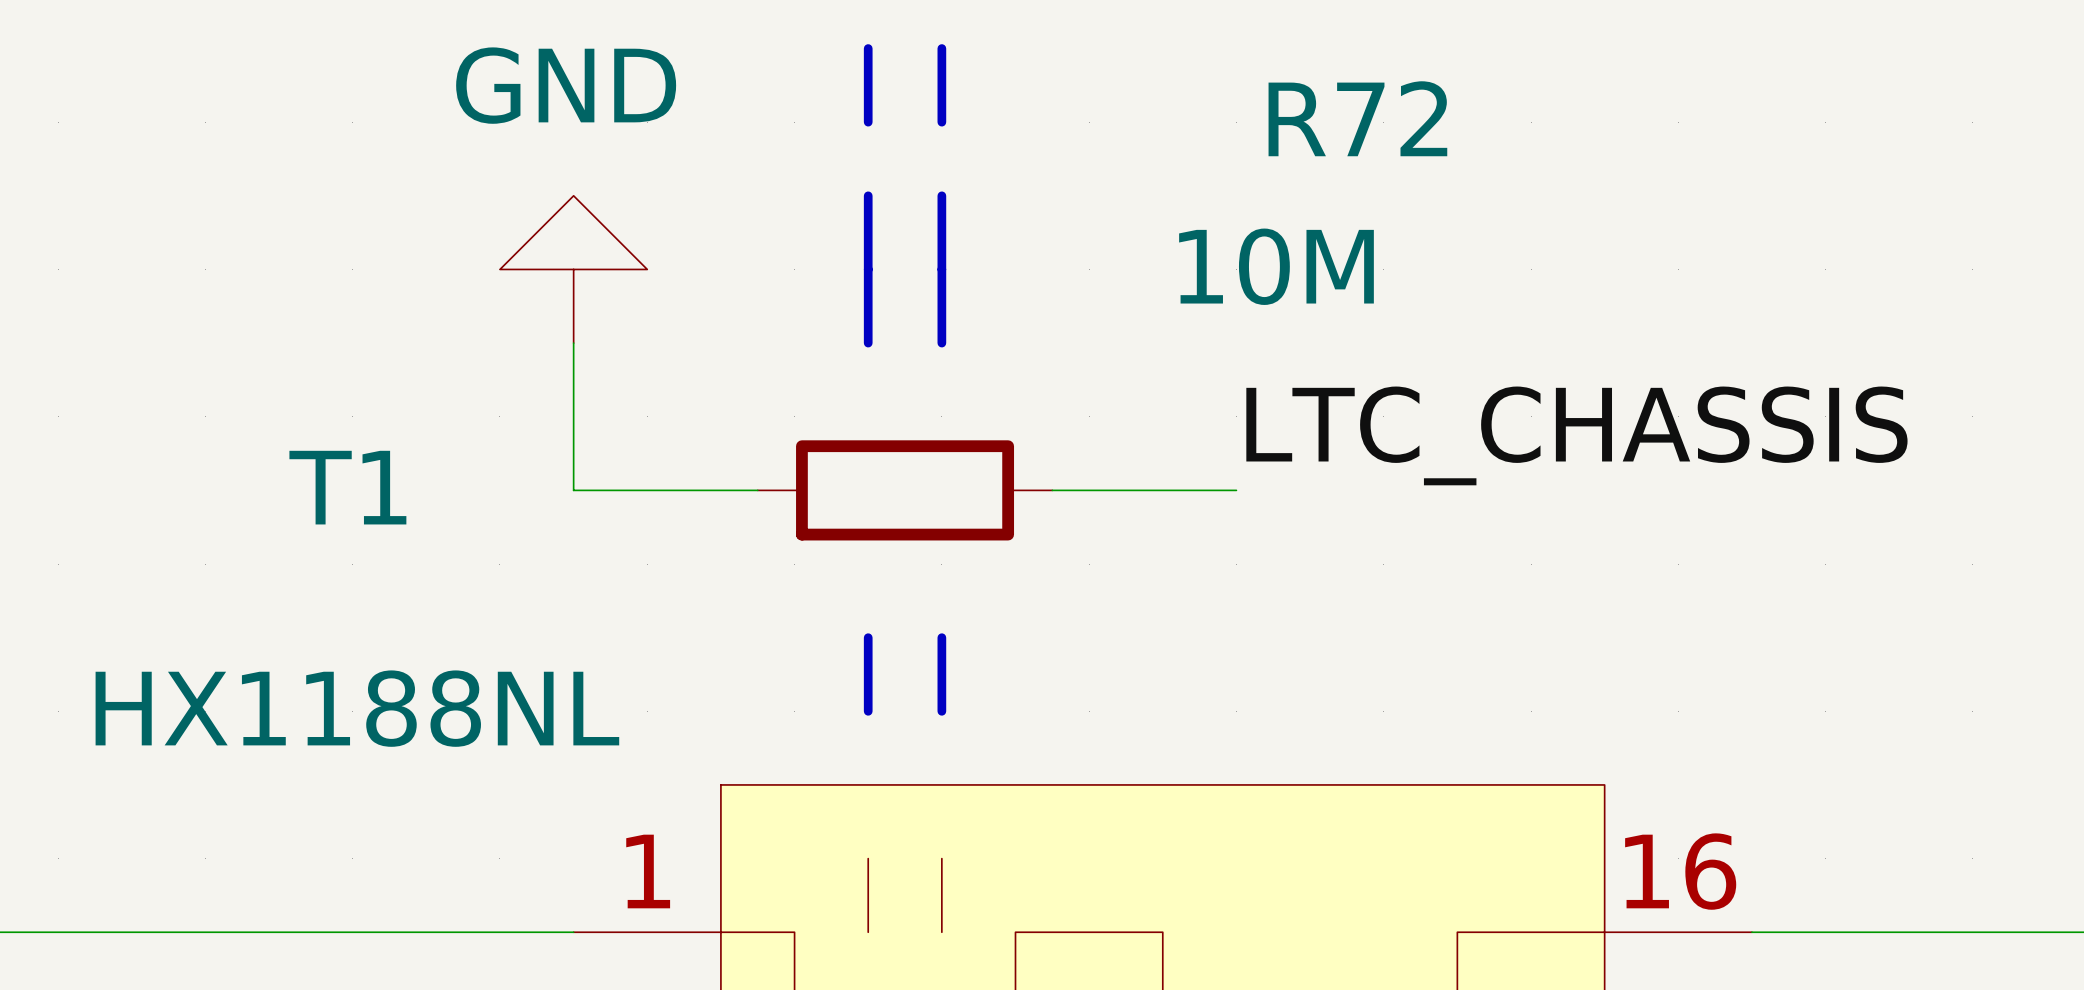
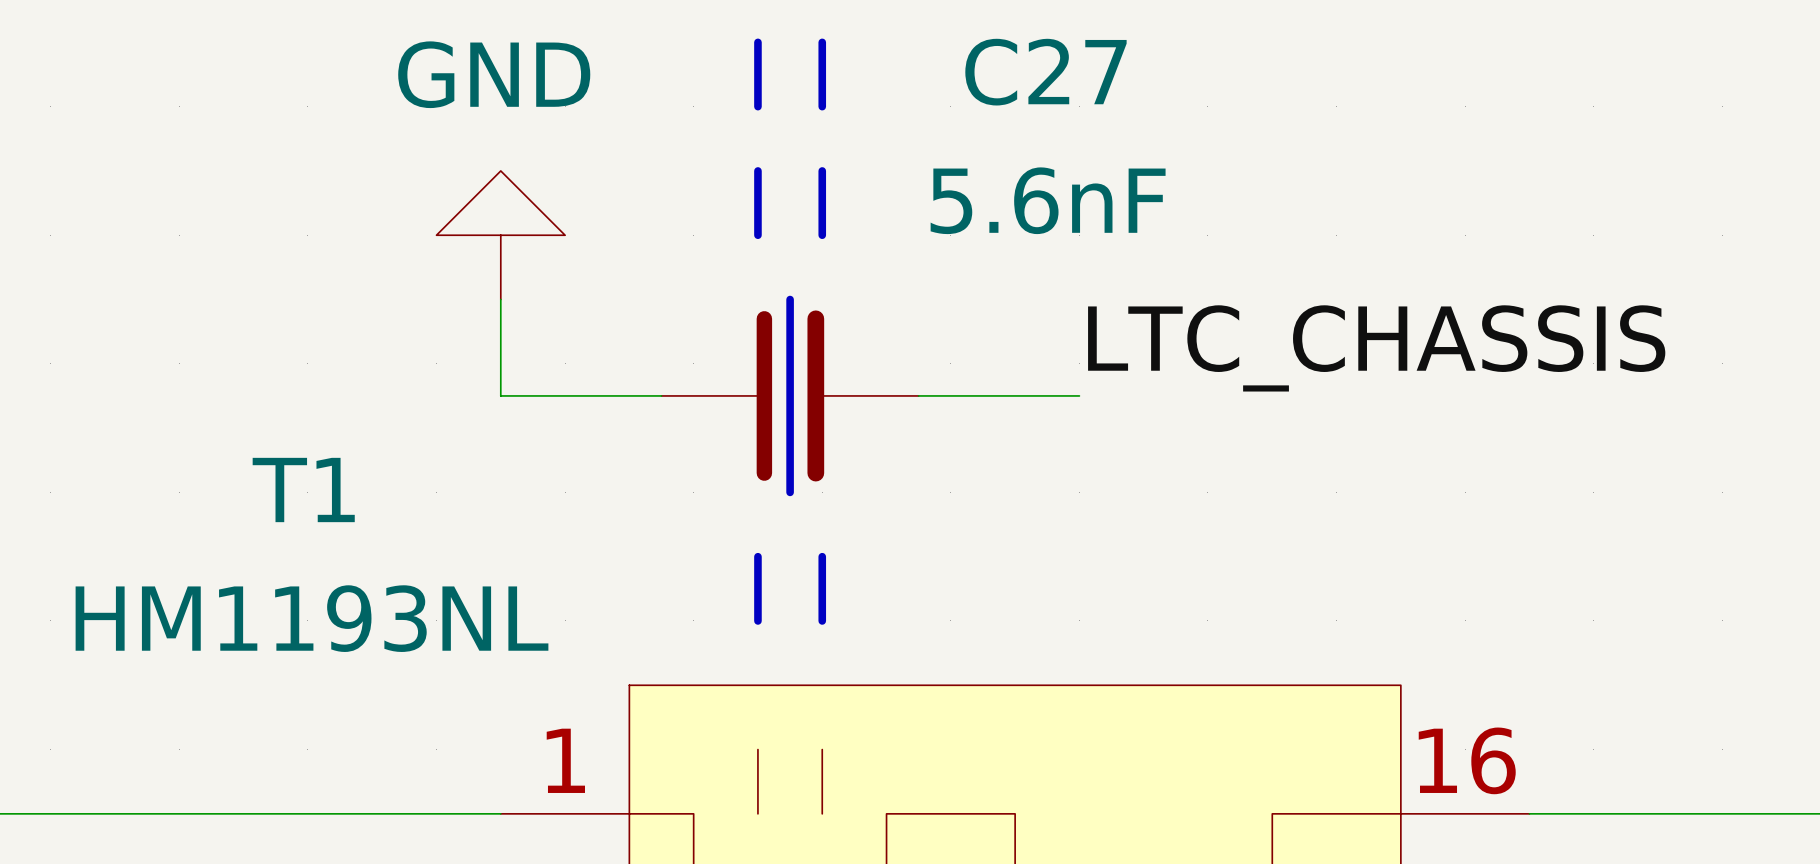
line: (868, 269) (868, 343) -> none
line: (941, 269) (941, 343) -> none
line: none -> (790, 299) (790, 492)
label position: LTC_CHASSIS (1576, 435) -> LTC_CHASSIS (1376, 348)
wire: (573, 453) (573, 490) (757, 490) -> (500, 395) (661, 395)
C27: none -> 5.6nF (790, 395)
T1 name position: T1 (347, 487) -> T1 (303, 490)
R72: 10M (905, 490) -> none
wire: (1052, 490) (1236, 490) -> (918, 395) (1079, 395)
T1 value: HX1188NL (357, 708) -> HM1193NL (312, 618)

